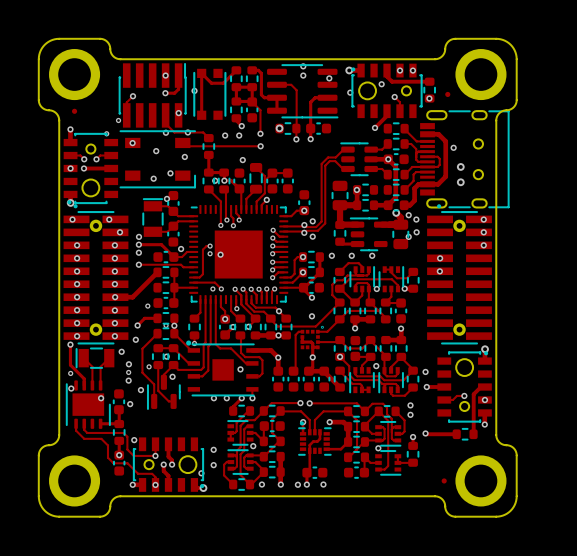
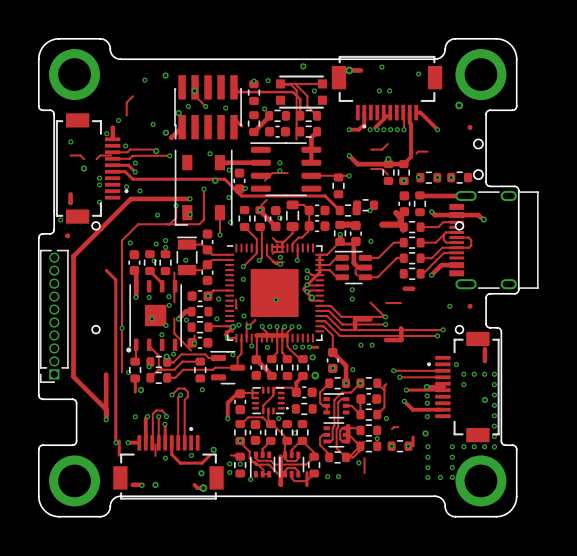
part footprint: [351, 63, 423, 119] -> [331, 55, 443, 129]
part footprint: [267, 64, 339, 119] -> [275, 75, 328, 109]
via: none -> (381, 67)
track: (236, 70) (223, 83) (211, 83) (201, 73) (201, 115) -> none
track: (252, 70) (258, 70) (261, 73) (261, 94) (264, 97) (276, 97) (276, 110) -> none
track: (387, 70) (387, 76) (392, 81) (428, 81) -> none
via: (399, 70) -> none
via: (412, 70) -> none
via: none -> (418, 74)
track: (178, 75) (178, 89) (174, 93) (165, 93) -> none
via: (303, 75) -> none
part: (236, 78) -> none
part: (252, 78) -> none
via: (329, 78) -> none
via: none -> (144, 80)
via: none -> (268, 80)
via: none -> (253, 81)
track: none -> (280, 83) (322, 83)
track: none -> (295, 83) (307, 95) (307, 106) (317, 115)
via: (381, 84) -> none
track: none -> (233, 87) (238, 92) (293, 92) (300, 99) (300, 115)
via: none -> (379, 90)
via: none -> (389, 90)
part: (429, 90) -> none
via: none -> (314, 91)
part: none -> (253, 92)
via: (350, 92) -> none
via: (165, 93) -> none
part: (209, 94) -> none
part position: (447, 94) -> (470, 127)
part rotation: 0° (152, 95) -> 180° (208, 107)
part position: (152, 95) -> (208, 107)
track: none -> (195, 95) (205, 106)
via: (133, 96) -> none
track: (327, 97) (315, 97) (310, 102) (310, 139) -> none
track: (394, 97) (399, 102) (399, 111) -> none
via: (394, 97) -> none
via: (429, 98) -> none
board edge: (38, 100) (42, 108) (56, 113) (59, 120) (59, 436) (54, 443) (41, 448) (38, 455) -> (38, 100) (40, 109) (51, 110) (54, 114) (54, 230) (51, 233) (41, 234) (38, 237) (38, 395) (42, 399) (73, 399) (76, 403) (75, 443) (41, 445) (38, 448) (38, 455)
board edge: (516, 100) (512, 108) (499, 113) (496, 120) (496, 436) (501, 443) (513, 448) (516, 455) -> (516, 100) (516, 107) (514, 109) (489, 110) (486, 114) (486, 183) (489, 186) (515, 186) (518, 190) (518, 290) (515, 293) (489, 293) (486, 297) (486, 325) (489, 327) (498, 328) (501, 331) (501, 441) (504, 445) (515, 446) (516, 455)
track: (251, 101) (236, 101) (236, 87) (252, 87) (252, 101) (260, 110) (260, 133) -> none
via: none -> (459, 105)
via: none -> (188, 106)
via: none -> (205, 106)
via: none -> (225, 108)
via: none -> (264, 108)
part: (236, 109) -> none
part: (252, 109) -> none
part position: (74, 111) -> (67, 235)
track: none -> (364, 112) (364, 124) (358, 129) (349, 129)
track: none -> (409, 112) (411, 157) (403, 164) (357, 164) (349, 155)
track: none -> (416, 112) (420, 112) (437, 129)
track: none -> (404, 113) (404, 129)
part: none -> (277, 115)
part: none -> (308, 115)
track: none -> (269, 116) (253, 132)
track: (165, 123) (174, 132) (203, 132) (208, 138) -> none
part: none -> (253, 123)
via: none -> (153, 124)
via: (241, 126) -> none
track: none -> (112, 127) (112, 139)
track: none -> (182, 127) (170, 137)
via: (375, 127) -> none
via: (279, 128) -> none
part: (287, 128) -> none
part: (318, 128) -> none
part: (396, 128) -> none
track: (70, 129) (70, 142) -> none
via: (70, 129) -> none
via: none -> (349, 129)
via: none -> (370, 129)
via: none -> (377, 129)
via: none -> (383, 129)
via: none -> (390, 129)
via: none -> (397, 129)
track: (404, 129) (416, 141) (427, 141) -> none
via: none -> (404, 129)
via: none -> (437, 129)
part: none -> (277, 131)
part: none -> (308, 131)
track: none -> (317, 131) (311, 137) (311, 162)
part footprint: [63, 132, 119, 205] -> [55, 113, 129, 224]
via: (187, 132) -> none
via: (260, 133) -> none
track: (427, 134) (438, 134) (445, 141) (445, 176) (438, 184) (418, 184) (414, 188) (414, 200) (409, 205) (404, 205) -> none
via: (225, 135) -> none
via: (239, 135) -> none
via: (296, 139) -> none
via: (310, 139) -> none
via: none -> (70, 141)
via: (132, 143) -> none
part: (396, 143) -> none
track: (404, 143) (411, 143) (416, 149) (416, 159) (418, 161) (427, 161) -> none
via: none -> (125, 146)
track: (186, 146) (260, 146) -> none
part: (208, 146) -> none
via: (260, 146) -> none
via: (453, 147) -> none
track: none -> (152, 149) (130, 149) (127, 152) (112, 152)
track: (343, 149) (335, 157) (328, 157) (321, 163) (321, 221) (316, 227) (306, 227) (304, 225) (283, 226) -> none
via: none -> (210, 153)
track: (208, 154) (208, 172) (224, 172) (224, 180) (231, 180) (239, 188) -> none
track: none -> (169, 155) (132, 155) (129, 158) (112, 158)
via: none -> (169, 155)
via: none -> (349, 155)
via: (184, 156) -> none
track: (427, 156) (437, 156) (439, 164) (437, 166) (412, 166) (404, 174) -> none
via: (84, 159) -> none
via: (96, 159) -> none
part: (157, 159) -> none
part position: (359, 159) -> (353, 267)
track: (371, 159) (388, 159) (395, 166) (395, 197) (388, 205) (373, 205) -> none
part: (396, 159) -> none
part position: (464, 159) -> (493, 240)
via: (242, 160) -> none
track: none -> (219, 162) (250, 162)
via: none -> (279, 162)
via: none -> (135, 163)
track: none -> (112, 165) (128, 165) (135, 172)
via: (460, 166) -> none
track: (256, 167) (264, 176) (264, 193) (256, 201) (256, 209) -> none
via: (70, 168) -> none
track: (83, 168) (111, 168) -> none
part footprint: [202, 168, 215, 194] -> [174, 149, 233, 226]
part: none -> (285, 169)
track: (343, 169) (335, 161) (329, 161) (325, 165) (325, 223) (317, 230) (306, 230) (304, 232) (283, 231) -> none
via: none -> (229, 170)
via: none -> (279, 170)
track: none -> (112, 171) (125, 171) (132, 179) (224, 179) (241, 195) (325, 195) (339, 210)
via: none -> (135, 172)
part: none -> (388, 172)
part: none -> (403, 172)
track: (427, 172) (416, 172) (413, 174) (413, 181) (404, 189) -> none
via: (170, 173) -> none
part: (396, 174) -> none
track: none -> (311, 175) (349, 175)
via: none -> (349, 175)
via: none -> (418, 177)
part: none -> (428, 177)
via: none -> (437, 177)
via: none -> (451, 177)
part: none -> (459, 177)
via: none -> (99, 178)
via: (153, 178) -> none
part position: (256, 178) -> (292, 215)
via: (224, 180) -> none
via: none -> (403, 180)
part: (224, 181) -> none
part: (272, 181) -> none
part: (287, 181) -> none
via: (460, 182) -> none
via: none -> (99, 184)
part: none -> (338, 185)
via: none -> (126, 186)
via: none -> (245, 188)
track: none -> (203, 189) (203, 219) (199, 224) (138, 224) (122, 240) (121, 372)
via: none -> (203, 189)
track: (208, 189) (220, 201) (220, 225) -> none
track: (256, 189) (246, 198) (246, 209) -> none
via: (356, 189) -> none
track: (357, 189) (357, 205) (340, 205) (340, 224) -> none
part: (365, 189) -> none
part: (396, 189) -> none
via: none -> (139, 190)
track: (241, 190) (241, 209) -> none
track: (225, 191) (226, 220) -> none
part: (340, 195) -> none
track: none -> (420, 195) (466, 195)
via: none -> (228, 197)
via: (166, 198) -> none
track: none -> (189, 198) (130, 198) (73, 256) (73, 376) (106, 409)
via: none -> (189, 198)
via: (266, 199) -> none
via: (70, 202) -> none
via: none -> (99, 202)
part: (304, 202) -> none
part: (173, 203) -> none
part: none -> (404, 203)
part: none -> (419, 203)
track: none -> (292, 204) (303, 204) (309, 210) (309, 226)
track: none -> (176, 205) (176, 217) (169, 224)
via: none -> (176, 205)
part: (396, 205) -> none
track: (152, 206) (168, 206) (178, 216) (193, 216) -> none
track: (231, 209) (233, 225) -> none
track: (236, 209) (239, 220) -> none
via: none -> (260, 209)
track: none -> (260, 210) (275, 226)
track: (304, 210) (296, 210) (291, 216) (283, 216) -> none
via: (304, 210) -> none
part: none -> (317, 210)
part: none -> (348, 210)
via: none -> (370, 210)
track: none -> (431, 211) (434, 215) (478, 215) (480, 217)
via: none -> (431, 211)
track: none -> (219, 212) (219, 234)
via: (396, 212) -> none
via: none -> (189, 214)
via: none -> (157, 215)
via: (408, 215) -> none
part position: (152, 217) -> (187, 256)
via: none -> (279, 217)
part: none -> (244, 218)
part: none -> (260, 218)
part: none -> (275, 218)
via: (72, 219) -> none
via: (109, 219) -> none
via: (416, 219) -> none
via: none -> (60, 220)
via: (226, 220) -> none
via: (239, 220) -> none
track: (193, 221) (178, 221) (167, 231) (152, 231) -> none
via: (312, 221) -> none
via: none -> (230, 222)
track: none -> (456, 222) (443, 222) (438, 227) (420, 227)
via: (220, 225) -> none
via: (233, 225) -> none
via: (304, 225) -> none
track: none -> (244, 226) (256, 239) (256, 253) (243, 266)
track: none -> (292, 226) (292, 233) (282, 243) (282, 248)
track: none -> (308, 226) (308, 231) (292, 243) (292, 248)
part: none -> (317, 226)
part: none -> (412, 227)
track: none -> (261, 228) (261, 257) (259, 260)
track: (273, 230) (279, 236) (283, 236) -> none
via: (273, 230) -> none
track: none -> (402, 231) (403, 232)
via: (119, 232) -> none
via: (304, 232) -> none
via: (416, 232) -> none
track: none -> (456, 232) (446, 232) (435, 242) (420, 242)
via: (483, 232) -> none
part: none -> (355, 233)
part: (173, 234) -> none
via: none -> (219, 234)
track: none -> (340, 234) (340, 241) (327, 254) (319, 254)
via: none -> (340, 234)
part: (368, 234) -> none
part: (400, 234) -> none
track: none -> (443, 234) (443, 240) (446, 242) (456, 242)
via: (138, 236) -> none
via: (312, 236) -> none
via: (408, 236) -> none
track: none -> (456, 237) (468, 237) (471, 240) (471, 245) (468, 247) (442, 247) (431, 258) (420, 258)
via: (272, 238) -> none
via: none -> (165, 240)
via: none -> (370, 241)
part: none -> (207, 242)
track: none -> (403, 242) (393, 242) (378, 257) (365, 257)
part: none -> (412, 242)
via: none -> (130, 243)
track: none -> (353, 243) (353, 263) (358, 267) (365, 267)
track: (138, 244) (161, 244) (173, 257) (182, 257) (187, 251) (193, 251) -> none
via: (138, 244) -> none
via: none -> (156, 244)
track: none -> (187, 244) (202, 244) (212, 254) (229, 254)
via: (77, 245) -> none
via: (114, 245) -> none
via: (483, 245) -> none
track: (210, 246) (206, 246) (202, 249) (202, 274) (199, 277) (193, 277) -> none
via: (210, 246) -> none
via: (272, 246) -> none
via: none -> (165, 247)
via: (181, 248) -> none
track: none -> (267, 248) (267, 255) (276, 264) (280, 264)
track: none -> (297, 248) (297, 260)
via: (138, 252) -> none
track: none -> (456, 252) (444, 252) (423, 273)
via: (210, 253) -> none
via: (272, 253) -> none
via: (220, 254) -> none
part position: (238, 254) -> (274, 293)
via: (331, 255) -> none
via: (351, 255) -> none
via: (372, 255) -> none
part: (165, 257) -> none
via: none -> (280, 257)
track: (303, 257) (297, 257) (294, 260) (294, 273) (291, 277) (283, 277) -> none
via: (303, 257) -> none
part: (311, 257) -> none
track: none -> (336, 257) (329, 264) (319, 264)
via: (77, 258) -> none
via: (114, 258) -> none
track: none -> (403, 258) (396, 258) (377, 277) (369, 277)
part: none -> (412, 258)
via: (440, 258) -> none
track: none -> (229, 259) (212, 259) (202, 270) (187, 270)
via: none -> (154, 260)
via: none -> (185, 260)
via: none -> (259, 260)
via: none -> (297, 260)
part: none -> (134, 262)
part: none -> (149, 262)
part: none -> (165, 262)
via: (272, 262) -> none
track: (138, 264) (181, 264) (183, 267) (193, 267) -> none
via: (138, 264) -> none
via: none -> (280, 264)
track: none -> (456, 265) (441, 265) (431, 275)
via: none -> (243, 266)
track: (283, 267) (275, 267) (272, 269) -> none
via: (272, 269) -> none
track: (362, 269) (358, 263) (348, 263) (339, 271) -> none
track: (368, 269) (367, 275) (347, 275) (342, 280) (336, 280) (332, 284) (332, 295) (339, 302) (315, 326) (277, 326) (270, 319) -> none
track: (384, 269) (391, 269) (391, 272) (396, 278) (406, 278) (413, 271) -> none
track: none -> (106, 270) (115, 279) (115, 442)
track: none -> (307, 270) (311, 275) (319, 275)
via: none -> (307, 270)
track: none -> (319, 270) (329, 270) (336, 277)
via: (77, 271) -> none
via: (114, 271) -> none
track: none -> (149, 271) (161, 283)
via: (439, 271) -> none
track: none -> (136, 272) (135, 297)
track: (157, 272) (132, 297) (115, 297) -> none
part: (165, 272) -> none
part: none -> (207, 272)
track: (283, 272) (278, 272) (272, 277) -> none
track: (303, 272) (292, 282) (283, 282) -> none
via: (303, 272) -> none
part: (311, 272) -> none
part: (95, 274) -> none
part: (459, 274) -> none
via: none -> (431, 275)
via: (272, 277) -> none
via: none -> (306, 277)
via: none -> (243, 279)
part: (362, 279) -> none
part: (391, 279) -> none
part: (339, 280) -> none
part rotation: 0° (413, 280) -> 90° clockwise (412, 273)
track: (193, 282) (214, 282) (221, 288) -> none
via: (77, 284) -> none
via: (114, 284) -> none
track: none -> (307, 284) (319, 285)
via: none -> (307, 284)
part: (165, 287) -> none
track: (174, 287) (193, 287) -> none
track: (283, 287) (303, 287) -> none
part: (311, 287) -> none
via: (212, 288) -> none
via: (221, 288) -> none
via: (266, 288) -> none
track: (274, 288) (271, 291) (271, 299) -> none
via: (274, 288) -> none
track: (339, 288) (349, 279) (391, 279) (397, 285) (397, 288) -> none
track: (340, 288) (354, 302) -> none
track: (355, 288) (357, 283) (367, 283) (368, 284) (368, 300) -> none
track: (362, 288) (362, 295) (355, 302) -> none
via: (376, 288) -> none
track: (391, 288) (391, 296) (385, 302) -> none
via: (404, 288) -> none
track: (235, 289) (241, 295) (241, 304) (255, 318) -> none
via: (235, 289) -> none
track: (243, 289) (246, 292) (246, 303) (254, 311) (263, 311) (270, 318) -> none
via: (243, 289) -> none
track: (251, 289) (256, 294) (256, 299) -> none
via: (251, 289) -> none
track: (259, 289) (261, 291) (261, 299) -> none
via: (259, 289) -> none
via: none -> (352, 289)
track: none -> (229, 290) (213, 290) (207, 296)
track: none -> (319, 290) (307, 291)
via: none -> (307, 291)
via: none -> (169, 296)
part: none -> (200, 296)
via: none -> (208, 296)
via: (77, 297) -> none
via: (115, 297) -> none
via: none -> (135, 297)
via: none -> (149, 297)
via: none -> (218, 298)
via: none -> (242, 298)
track: none -> (308, 298) (310, 300) (319, 300)
track: (200, 299) (200, 312) (194, 318) -> none
track: (205, 299) (203, 367) (201, 369) (178, 369) (173, 365) (163, 374) (163, 382) -> none
track: (210, 299) (208, 370) (202, 376) (193, 376) -> none
track: (215, 299) (215, 344) (220, 348) (231, 348) (245, 363) (252, 363) -> none
track: (220, 299) (220, 306) (225, 311) (225, 319) -> none
track: (231, 299) (231, 310) (240, 318) -> none
track: (251, 299) (251, 303) (255, 307) (275, 307) (286, 318) -> none
via: none -> (276, 299)
via: none -> (352, 299)
part: (165, 303) -> none
via: none -> (169, 305)
track: none -> (319, 305) (330, 305) (341, 316) (385, 316)
via: (147, 306) -> none
via: none -> (449, 306)
part: none -> (470, 306)
via: (236, 308) -> none
via: (77, 310) -> none
via: (114, 310) -> none
track: none -> (319, 310) (328, 310) (342, 324) (385, 324)
part: (339, 310) -> none
part: (355, 310) -> none
part: (370, 310) -> none
track: (378, 310) (348, 310) (327, 331) (317, 331) -> none
part: (385, 310) -> none
part: (401, 310) -> none
track: none -> (191, 311) (185, 311) (178, 319)
part: none -> (200, 311)
via: (279, 311) -> none
part: none -> (54, 316)
part: none -> (153, 316)
via: none -> (244, 316)
via: (311, 316) -> none
track: none -> (319, 316) (327, 316) (341, 330) (443, 329)
via: none -> (385, 316)
via: none -> (152, 318)
track: (157, 318) (144, 318) (137, 325) -> none
part: (165, 318) -> none
via: none -> (216, 318)
via: none -> (178, 319)
via: (225, 319) -> none
via: none -> (186, 320)
track: none -> (319, 321) (325, 321) (339, 335) (437, 335)
track: none -> (246, 322) (246, 338)
via: (77, 323) -> none
via: (114, 323) -> none
via: none -> (385, 324)
via: (137, 325) -> none
via: (174, 325) -> none
via: none -> (238, 325)
track: none -> (262, 326) (267, 332) (267, 338)
via: none -> (262, 326)
via: none -> (269, 326)
track: none -> (277, 326) (277, 352) (271, 357)
via: none -> (277, 326)
track: none -> (284, 326) (282, 328) (282, 352) (287, 357)
via: none -> (284, 326)
track: none -> (291, 326) (287, 332) (287, 346) (298, 357) (302, 357)
via: none -> (291, 326)
via: none -> (299, 326)
track: none -> (319, 326) (323, 326) (332, 335) (332, 352) (346, 365) (346, 383)
part rotation: 0° (194, 327) -> 90° clockwise (200, 327)
part: (225, 327) -> none
part: (240, 327) -> none
part: (255, 327) -> none
part: (270, 327) -> none
part: (286, 327) -> none
via: none -> (122, 328)
via: (355, 328) -> none
via: (401, 328) -> none
via: none -> (443, 329)
track: (302, 331) (298, 331) (295, 334) (295, 369) -> none
track: (157, 333) (142, 348) (142, 372) (154, 384) (154, 401) -> none
part: (165, 333) -> none
via: none -> (161, 334)
track: (240, 335) (240, 352) (245, 357) (259, 357) (262, 360) (262, 373) (259, 376) (252, 376) -> none
via: (278, 335) -> none
via: none -> (437, 335)
via: (77, 336) -> none
via: (114, 336) -> none
track: (302, 336) (302, 342) (312, 343) (312, 367) (308, 371) (324, 371) -> none
via: none -> (227, 337)
part: (312, 337) -> none
track: none -> (227, 338) (236, 338)
track: none -> (241, 338) (241, 353) (237, 357) (237, 367) (183, 369) (179, 373)
track: none -> (256, 338) (256, 357)
via: (135, 339) -> none
part footprint: [186, 340, 259, 396] -> [210, 351, 246, 385]
track: (370, 340) (385, 356) -> (256, 359) (271, 374)
track: (370, 340) (362, 348) (348, 348) (340, 340) -> none
part: none -> (200, 342)
track: (317, 342) (338, 342) -> (209, 326) (229, 326)
track: (70, 344) (70, 365) (84, 378) (84, 385) -> none
via: (70, 344) -> none
via: none -> (251, 345)
via: none -> (360, 345)
via: none -> (372, 345)
track: none -> (149, 346) (158, 355) (158, 365) (162, 369)
via: none -> (267, 347)
via: none -> (295, 347)
via: none -> (302, 347)
via: none -> (309, 347)
track: none -> (135, 348) (135, 360)
track: (158, 348) (173, 348) (188, 363) -> none
part: (340, 348) -> none
part: (355, 348) -> none
part: (370, 348) -> none
part: (385, 348) -> none
part: (401, 348) -> none
via: (485, 349) -> none
track: (252, 350) (271, 350) (278, 357) (278, 371) -> none
via: (121, 351) -> none
part footprint: [437, 351, 492, 423] -> [426, 331, 500, 443]
via: none -> (173, 354)
via: none -> (232, 354)
part rotation: 0° (158, 356) -> 90° clockwise (158, 361)
part: (173, 356) -> none
track: (340, 356) (349, 366) (349, 374) (354, 380) (378, 380) (382, 383) (395, 383) (397, 389) -> none
via: (340, 356) -> none
track: (355, 356) (370, 356) (361, 365) (361, 370) -> none
track: (401, 356) (391, 367) (391, 370) -> none
track: none -> (218, 357) (208, 357) (205, 354) (181, 354) (173, 362) (169, 362)
via: (278, 357) -> none
track: (401, 357) (413, 369) -> none
track: (83, 358) (92, 366) (92, 385) -> none
part: (95, 358) -> none
track: (109, 358) (100, 366) (100, 385) -> none
track: (384, 358) (384, 373) (386, 376) (395, 376) (397, 370) -> none
part: none -> (332, 360)
track: none -> (200, 361) (182, 361) (174, 369) (158, 369) (150, 377)
via: (128, 364) -> none
via: none -> (456, 364)
track: (158, 365) (158, 390) (168, 401) (173, 401) -> none
via: (376, 366) -> none
part: none -> (256, 367)
part: none -> (271, 367)
part: none -> (287, 367)
part: none -> (302, 367)
part footprint: [349, 367, 375, 394] -> [356, 377, 382, 390]
via: none -> (332, 368)
via: (240, 369) -> none
via: none -> (352, 369)
part: none -> (135, 370)
part: none -> (200, 370)
track: (355, 370) (357, 376) (380, 376) (384, 380) (403, 380) (413, 370) -> none
track: none -> (393, 370) (442, 370)
via: none -> (393, 370)
track: (324, 371) (340, 387) -> none
track: (340, 371) (352, 383) (360, 383) (361, 389) (368, 389) -> none
via: (425, 371) -> none
via: (70, 373) -> none
track: none -> (106, 374) (106, 419)
track: none -> (179, 374) (175, 377) (169, 377)
via: none -> (463, 374)
via: none -> (474, 374)
via: none -> (484, 374)
via: none -> (494, 374)
track: none -> (302, 375) (296, 382) (296, 392) (291, 387) (275, 387) (273, 389)
via: none -> (315, 375)
via: (172, 376) -> none
part: none -> (158, 377)
track: none -> (399, 377) (442, 377)
via: none -> (399, 377)
track: none -> (135, 378) (135, 392)
part: (278, 379) -> none
part: (293, 379) -> none
part: (308, 379) -> none
part: (324, 379) -> none
part rotation: 0° (340, 379) -> 90° clockwise (337, 383)
part: (413, 379) -> none
via: (128, 380) -> none
part: (391, 380) -> none
track: none -> (329, 383) (320, 392) (320, 402) (326, 405) (326, 412)
via: none -> (346, 383)
track: none -> (360, 383) (351, 392) (341, 392) (334, 400) (332, 439) (326, 441)
via: none -> (360, 383)
track: none -> (377, 383) (384, 390) (384, 407) (377, 414)
via: none -> (463, 384)
via: none -> (494, 384)
track: (413, 387) (404, 395) (393, 395) (391, 389) -> none
track: (480, 387) (473, 394) (473, 433) -> none
via: (71, 388) -> none
via: none -> (202, 389)
track: none -> (273, 390) (273, 395) (263, 405) (263, 410)
track: none -> (406, 390) (442, 390)
via: none -> (406, 390)
part: (163, 392) -> none
track: none -> (242, 392) (255, 392)
part: none -> (304, 392)
track: none -> (240, 393) (236, 393) (227, 402) (227, 418)
track: none -> (172, 394) (178, 388) (184, 388) (187, 392) (187, 396) (184, 399) (184, 442)
via: none -> (172, 394)
track: none -> (180, 395) (178, 397) (178, 442)
via: none -> (180, 395)
via: none -> (427, 395)
track: (464, 395) (456, 395) (452, 399) (444, 399) -> none
via: (464, 395) -> none
via: none -> (494, 395)
via: (101, 398) -> none
via: (213, 398) -> none
via: (226, 398) -> none
track: (241, 398) (233, 406) (233, 411) -> none
via: (241, 398) -> none
via: (252, 398) -> none
track: none -> (346, 399) (341, 399) (338, 402) (336, 448) (346, 457) (353, 457) (360, 450) (360, 446) (349, 434) (346, 434)
track: none -> (360, 399) (360, 414) (351, 405) (346, 405)
part: none -> (368, 399)
part: none -> (270, 400)
part: (118, 401) -> none
track: none -> (404, 401) (412, 409) (442, 409)
via: none -> (404, 401)
track: (300, 403) (271, 403) (254, 420) (246, 420) (240, 425) (240, 447) (236, 450) (236, 466) (230, 468) -> none
via: (300, 403) -> none
track: (309, 403) (356, 403) (364, 411) (372, 403) (383, 403) (387, 407) (387, 414) (391, 418) -> none
via: (309, 403) -> none
via: none -> (427, 403)
part: (88, 404) -> none
via: (130, 404) -> none
part footprint: [229, 405, 255, 417] -> [234, 389, 247, 415]
part: none -> (336, 405)
via: (410, 405) -> none
via: none -> (494, 405)
part: none -> (304, 408)
track: (118, 409) (119, 424) (100, 423) -> none
track: none -> (268, 410) (268, 422)
track: (248, 411) (236, 422) (236, 431) (230, 432) (230, 439) -> none
part: (272, 411) -> none
track: (280, 411) (272, 419) (272, 432) (280, 441) -> none
track: (281, 411) (301, 411) (309, 420) (309, 432) -> none
part: (356, 411) -> none
part: (387, 411) -> none
track: (395, 411) (404, 420) (404, 431) (398, 433) -> none
track: (484, 413) (484, 424) -> none
part: none -> (368, 414)
via: (410, 414) -> none
via: none -> (494, 415)
via: none -> (135, 416)
track: none -> (147, 416) (145, 418) (145, 442)
via: none -> (147, 416)
track: none -> (158, 416) (158, 442)
via: none -> (158, 416)
track: none -> (166, 416) (161, 410) (156, 410) (152, 413) (152, 442)
via: none -> (166, 416)
via: none -> (427, 416)
via: none -> (227, 418)
via: none -> (278, 418)
via: none -> (386, 418)
track: (391, 418) (391, 438) (398, 440) -> none
via: none -> (106, 419)
part footprint: [227, 420, 254, 446] -> [234, 419, 247, 446]
track: (303, 422) (303, 433) -> (285, 443) (285, 454)
via: (303, 422) -> none
track: (329, 422) (343, 422) (348, 426) -> none
via: (329, 422) -> none
track: (76, 423) (76, 430) (84, 438) (101, 438) (107, 445) (107, 457) (113, 463) (127, 463) (138, 473) (152, 473) (155, 477) (155, 484) -> none
track: (84, 423) (84, 429) (87, 432) (123, 432) (127, 436) (127, 449) (133, 455) (155, 455) -> none
track: none -> (164, 424) (165, 442)
via: none -> (164, 424)
via: (484, 424) -> none
track: none -> (240, 425) (248, 417) (262, 417) (270, 425)
track: (263, 425) (263, 441) (255, 432) (250, 432) -> none
track: none -> (273, 425) (287, 438)
track: (364, 425) (378, 411) (388, 420) (388, 465) (384, 469) (378, 469) -> none
track: (250, 426) (244, 429) (244, 450) (240, 454) (240, 475) (250, 484) -> none
part rotation: 0° (272, 426) -> 90° clockwise (255, 432)
part position: (272, 426) -> (255, 432)
part: (356, 426) -> none
track: (364, 426) (372, 433) (378, 433) -> none
via: none -> (494, 426)
track: (380, 427) (384, 428) (384, 438) (379, 440) -> none
track: none -> (358, 428) (342, 428) (340, 430) (340, 439) (346, 441)
part: none -> (368, 430)
part: (119, 432) -> none
part: none -> (270, 432)
part: none -> (287, 432)
via: none -> (295, 432)
part: none -> (302, 432)
track: (314, 432) (314, 420) (323, 411) (348, 411) (357, 420) (357, 449) -> none
track: (319, 432) (319, 438) (309, 445) (309, 469) -> none
part: (388, 433) -> none
track: (425, 433) (456, 434) -> none
track: none -> (326, 434) (320, 437) (320, 445) (329, 454)
part: none -> (336, 434)
part: (465, 434) -> none
via: none -> (494, 436)
part footprint: [132, 437, 205, 492] -> [113, 426, 224, 500]
via: (413, 437) -> none
part: (314, 438) -> none
via: none -> (377, 438)
via: (134, 440) -> none
via: none -> (240, 440)
track: none -> (270, 440) (262, 449) (262, 456)
track: none -> (300, 440) (291, 450) (291, 456)
track: none -> (302, 440) (314, 452) (314, 456) (306, 464) (274, 464) (270, 460) (258, 460) (255, 456)
track: (366, 440) (378, 440) -> none
part: (272, 441) -> none
track: (279, 441) (263, 456) -> none
track: (348, 441) (340, 449) (326, 449) -> none
part: (356, 441) -> none
via: none -> (115, 442)
track: none -> (128, 442) (139, 442)
via: none -> (128, 442)
track: none -> (171, 442) (171, 454) (180, 463) (202, 463) (209, 455)
track: none -> (240, 442) (249, 451) (249, 458) (255, 464) (268, 464) (278, 474) (285, 474) (287, 468) (295, 468) (298, 474)
track: (168, 444) (168, 456) (172, 460) (172, 464) -> none
via: (253, 446) -> none
part: none -> (368, 446)
via: none -> (391, 446)
via: none -> (408, 446)
via: none -> (427, 446)
via: none -> (452, 446)
via: none -> (463, 446)
via: none -> (474, 446)
via: none -> (484, 446)
via: none -> (494, 446)
via: (378, 448) -> none
part footprint: [227, 449, 254, 475] -> [234, 452, 247, 478]
track: none -> (284, 454) (287, 460) (296, 460) (298, 456)
part rotation: 0° (413, 454) -> 90° clockwise (400, 446)
part position: (413, 454) -> (400, 446)
via: (119, 455) -> none
via: (155, 455) -> none
via: none -> (191, 455)
track: (262, 455) (246, 455) (244, 457) (244, 466) (250, 468) -> none
part: (272, 456) -> none
track: (397, 456) (397, 462) (412, 462) -> none
part: none -> (337, 457)
part: (356, 457) -> none
track: (364, 457) (370, 462) (378, 462) -> none
via: none -> (427, 457)
via: none -> (452, 457)
via: none -> (165, 458)
track: (230, 461) (224, 464) (224, 475) (233, 484) -> none
via: none -> (358, 462)
part: (388, 462) -> none
part: (119, 463) -> none
via: none -> (229, 463)
track: (163, 464) (163, 471) (168, 475) (168, 484) -> none
via: (163, 464) -> none
via: (172, 464) -> none
via: none -> (240, 464)
part: none -> (262, 464)
part: none -> (291, 464)
via: (213, 465) -> none
part footprint: [302, 466, 328, 479] -> [308, 452, 321, 478]
via: none -> (427, 467)
via: none -> (452, 467)
via: none -> (229, 472)
track: (263, 472) (251, 484) -> none
part: (272, 472) -> none
part: (356, 472) -> none
track: none -> (314, 473) (306, 481) (294, 481) (291, 478) (291, 474)
track: none -> (262, 474) (269, 474)
via: none -> (327, 476)
via: none -> (338, 476)
via: none -> (427, 477)
via: none -> (440, 477)
via: none -> (452, 477)
via: none -> (250, 479)
part: (444, 480) -> none
via: (132, 484) -> none
part: (241, 484) -> none
via: (261, 484) -> none
via: (280, 484) -> none
via: (297, 484) -> none
via: (306, 484) -> none
via: (323, 484) -> none
via: none -> (141, 485)

